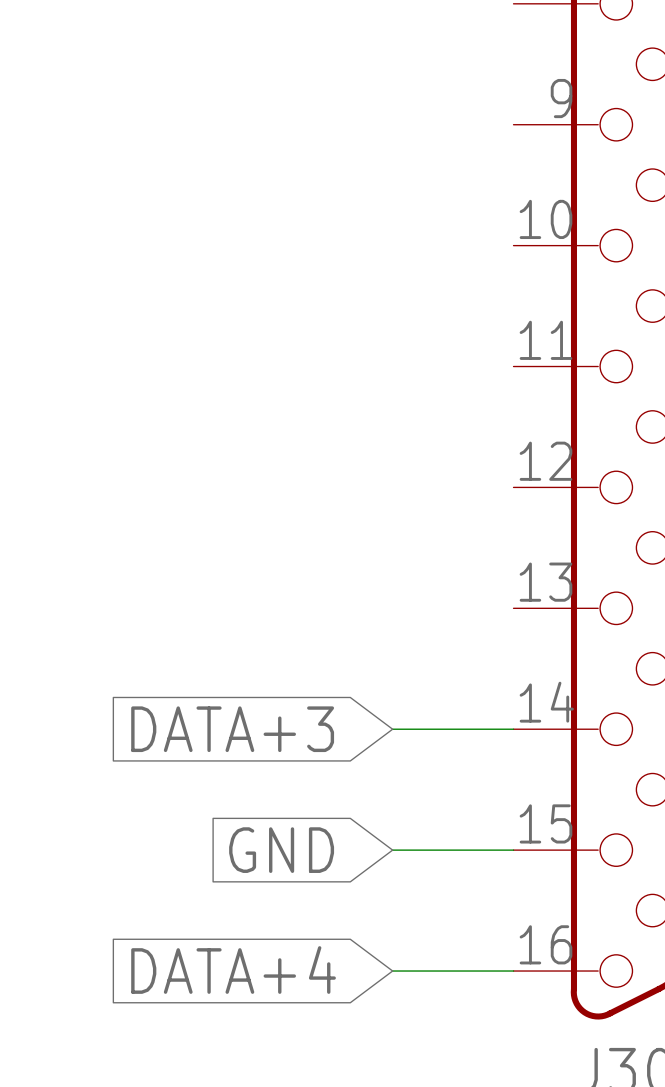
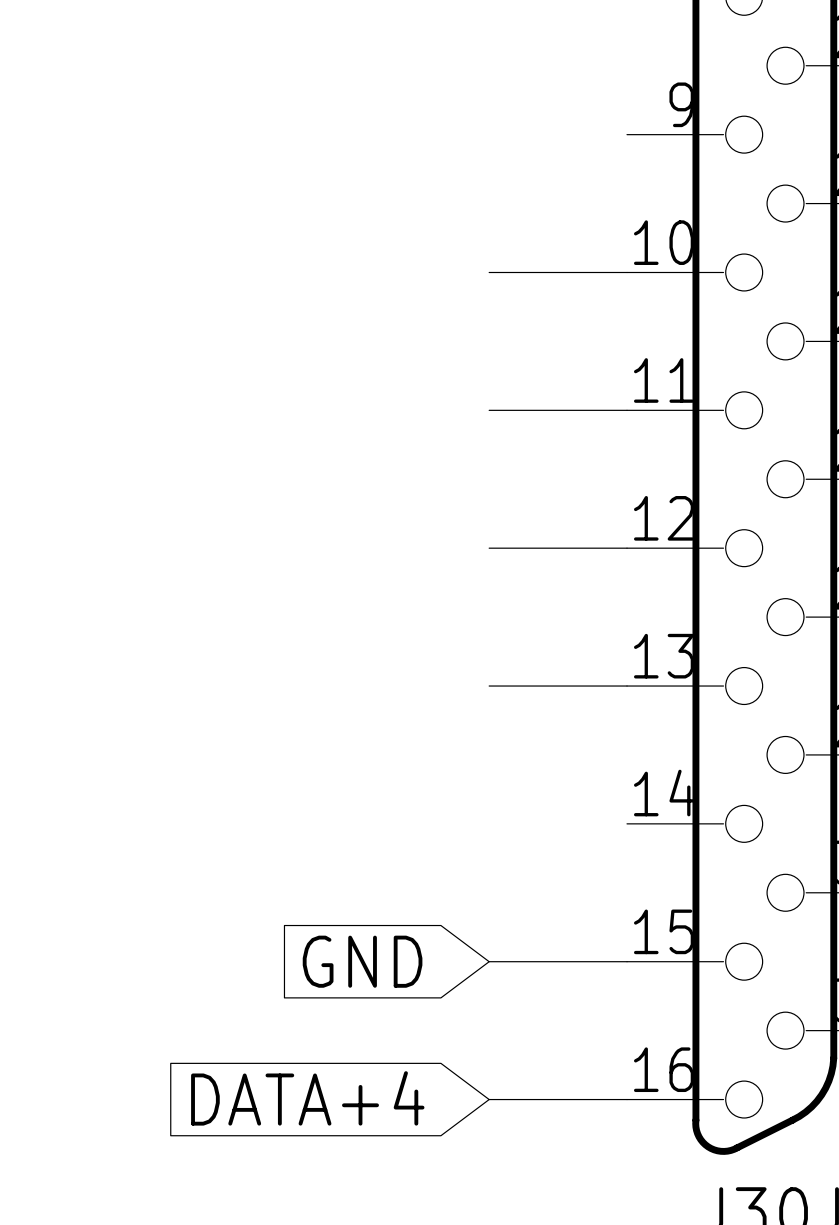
wire: none -> (489, 272) (627, 272)
wire: none -> (489, 410) (627, 410)
wire: none -> (489, 548) (627, 548)
global label: DATA+3 (232, 729) -> none
wire: (392, 729) (513, 729) -> (489, 686) (627, 686)

